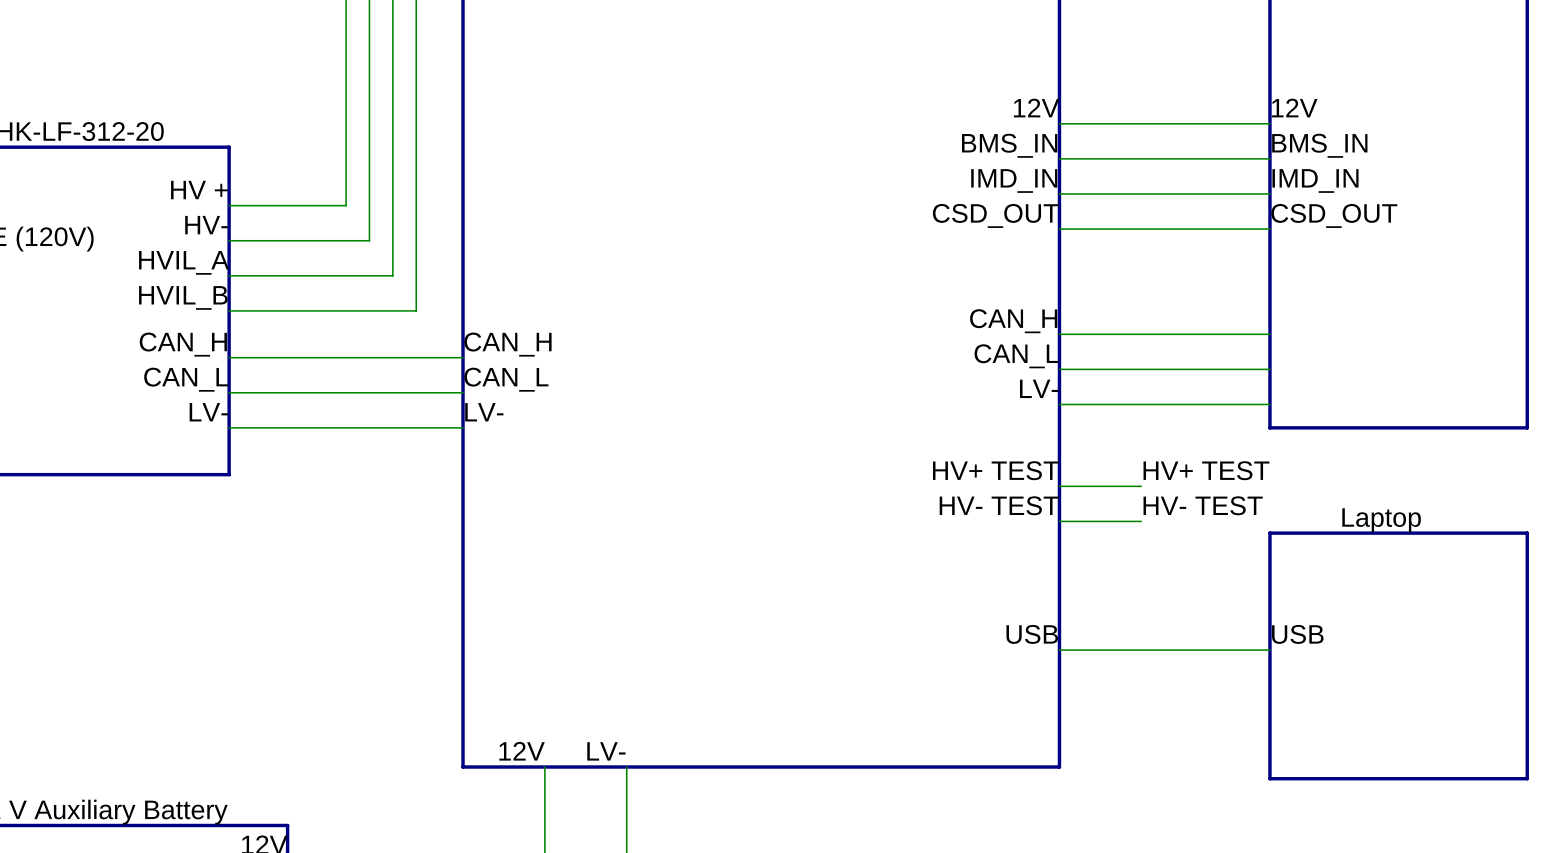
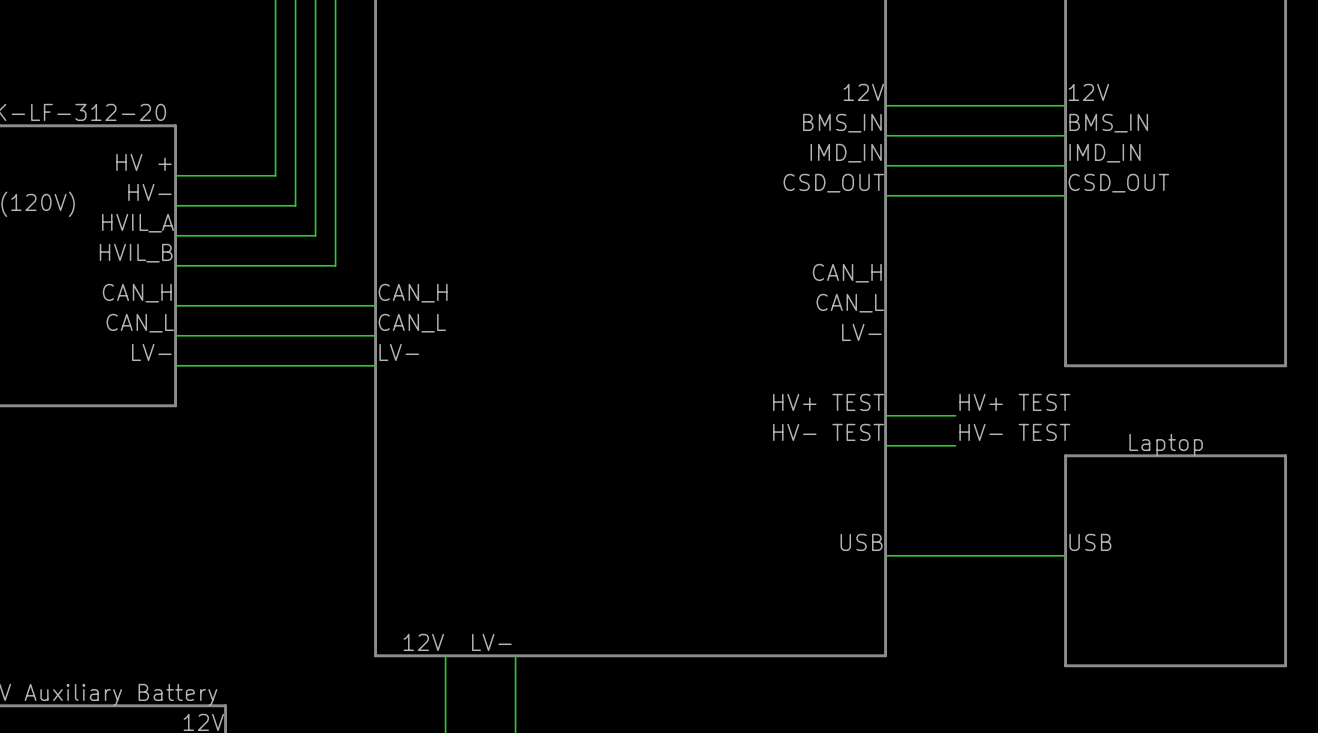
wire: (1059, 334) (1269, 334) -> none
wire: (1059, 369) (1269, 369) -> none
wire: (1059, 404) (1269, 404) -> none

